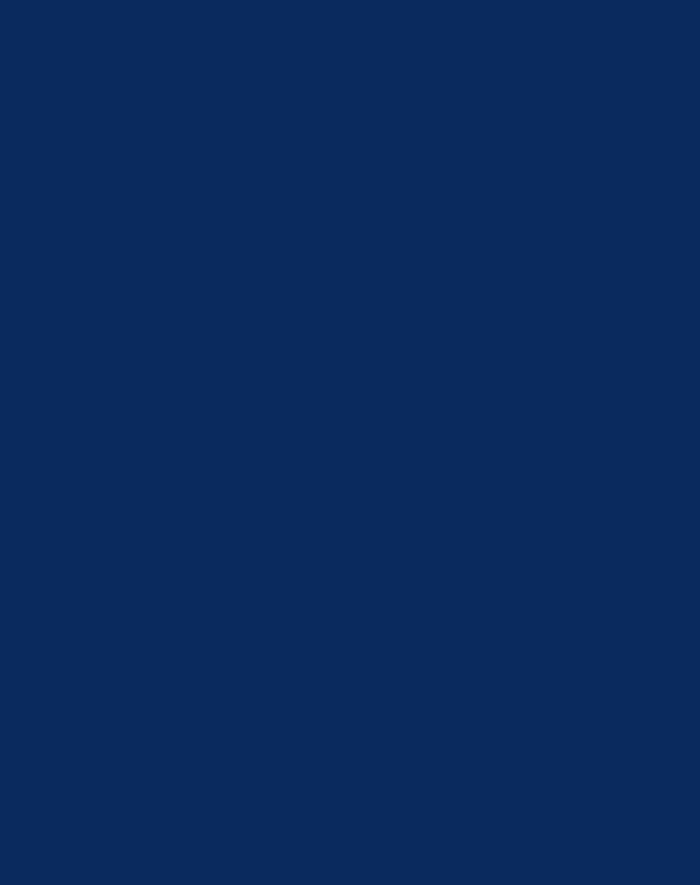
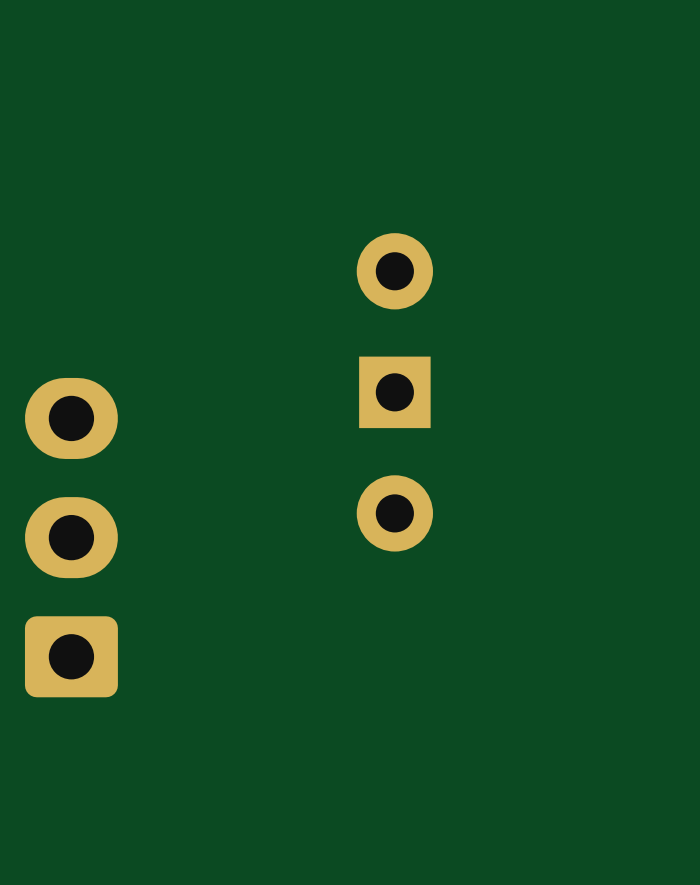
part: none -> (394, 392)
part: none -> (71, 537)

